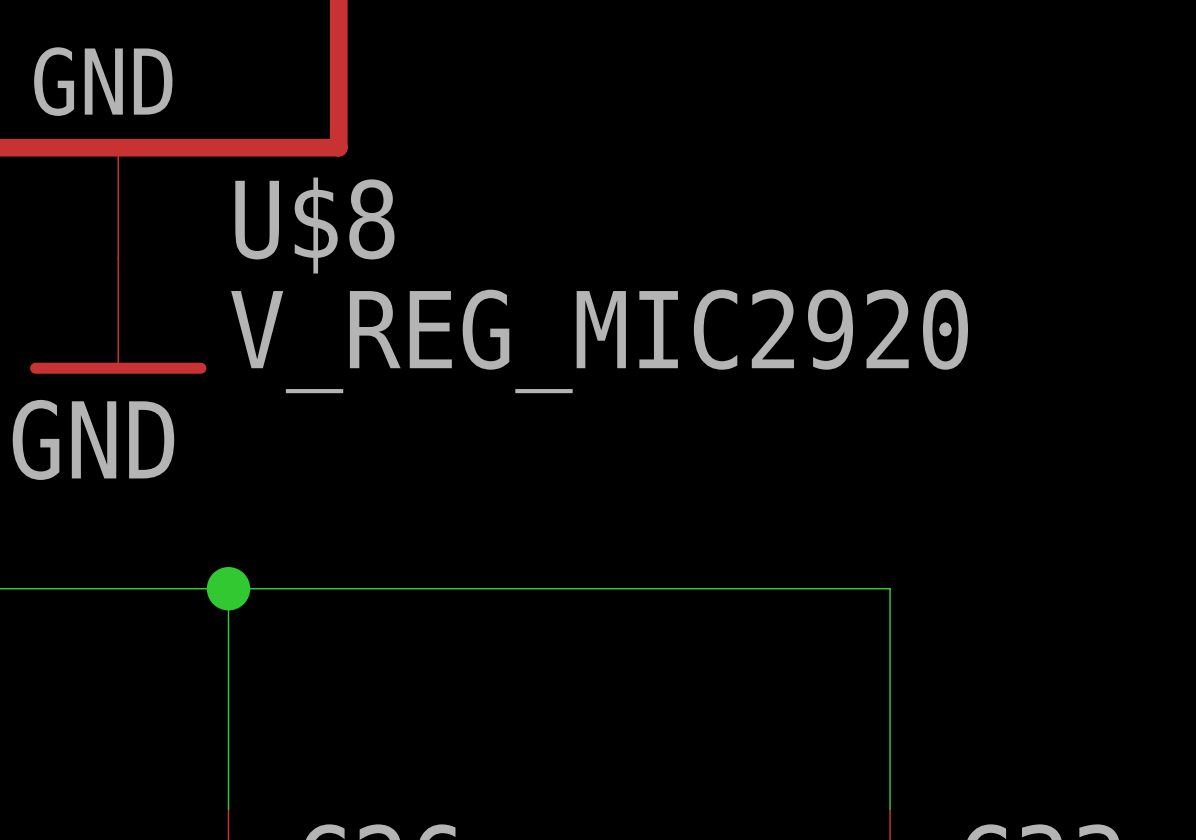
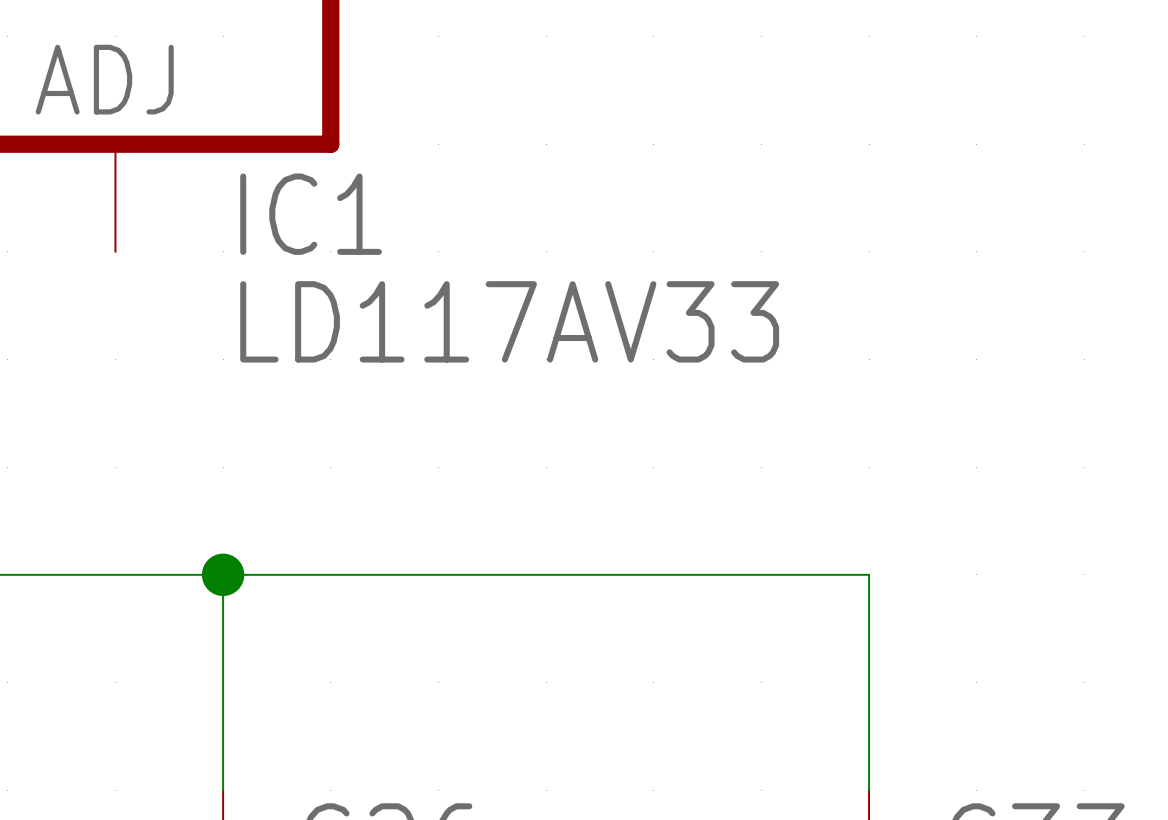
U$8 text: GND (103, 81) -> ADJ (104, 79)
U$8 name: U$8 (314, 225) -> IC1 (311, 214)
power symbol: GND (118, 315) -> none
U$8 value: V_REG_MIC2920 (599, 341) -> LD117AV33 (509, 321)

